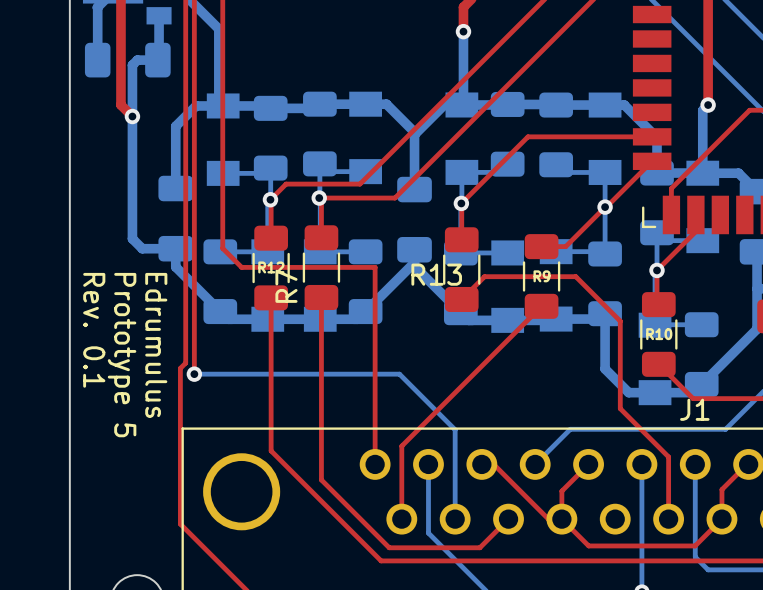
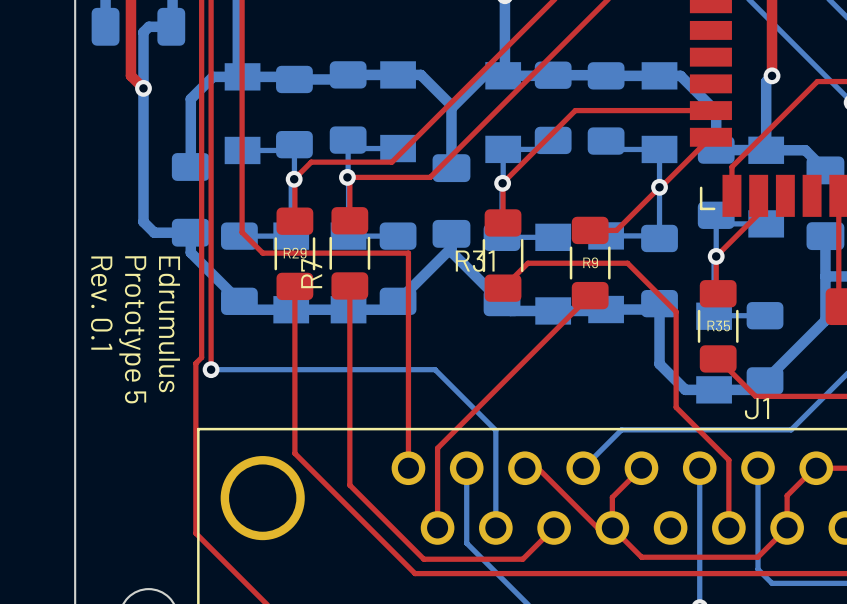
R12 name: R12 (271, 267) -> R29 (295, 253)
R13 name: R13 (436, 274) -> R31 (475, 261)
R10 name: R10 (659, 334) -> R35 (718, 326)

